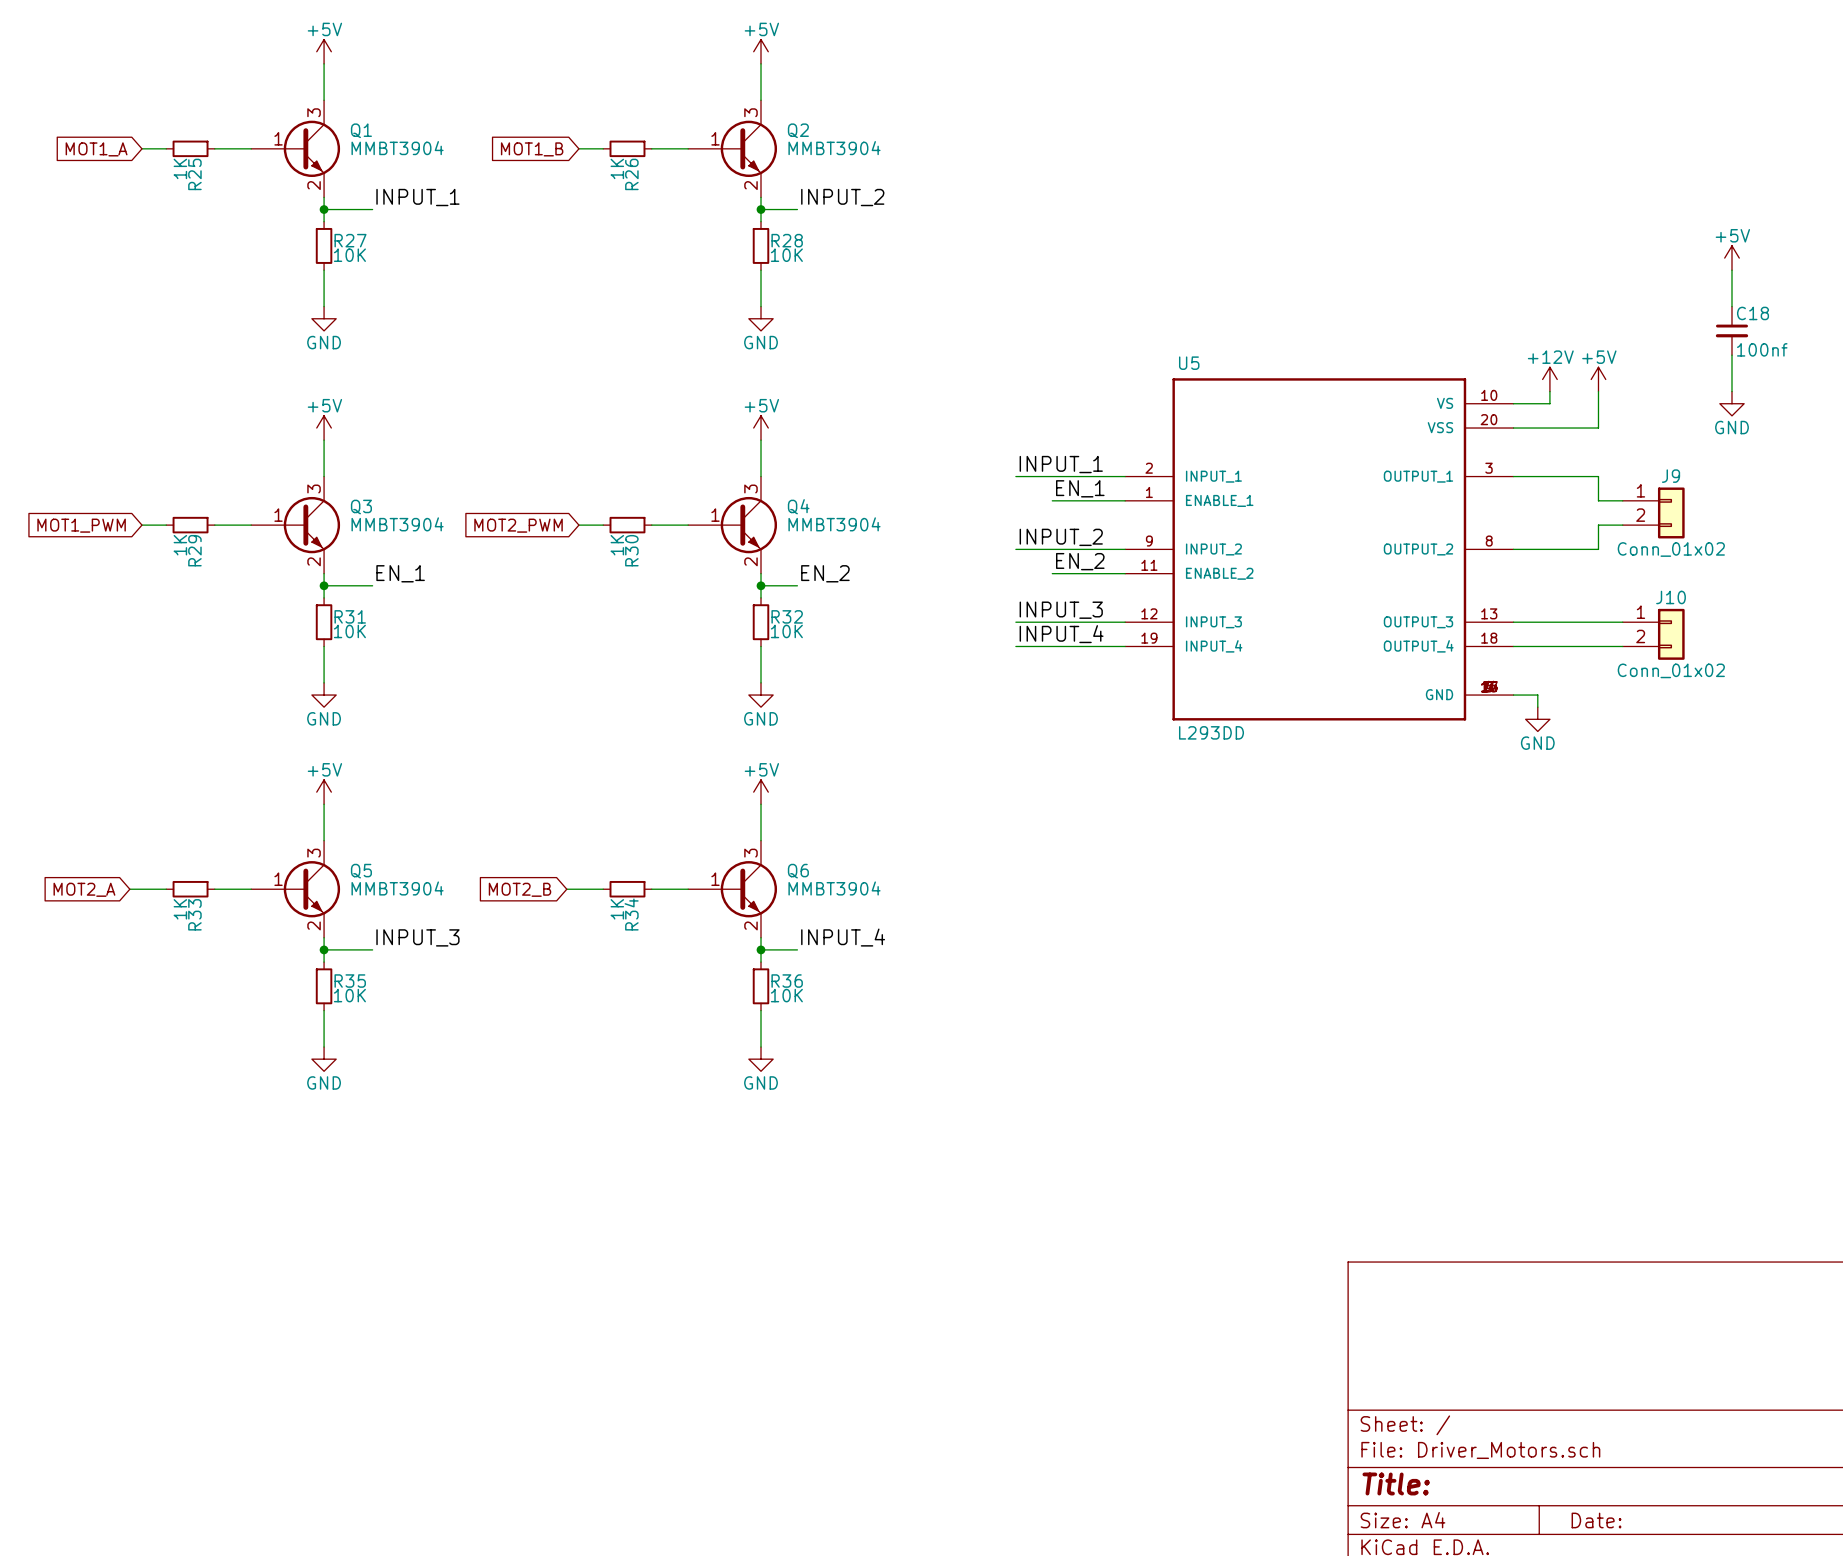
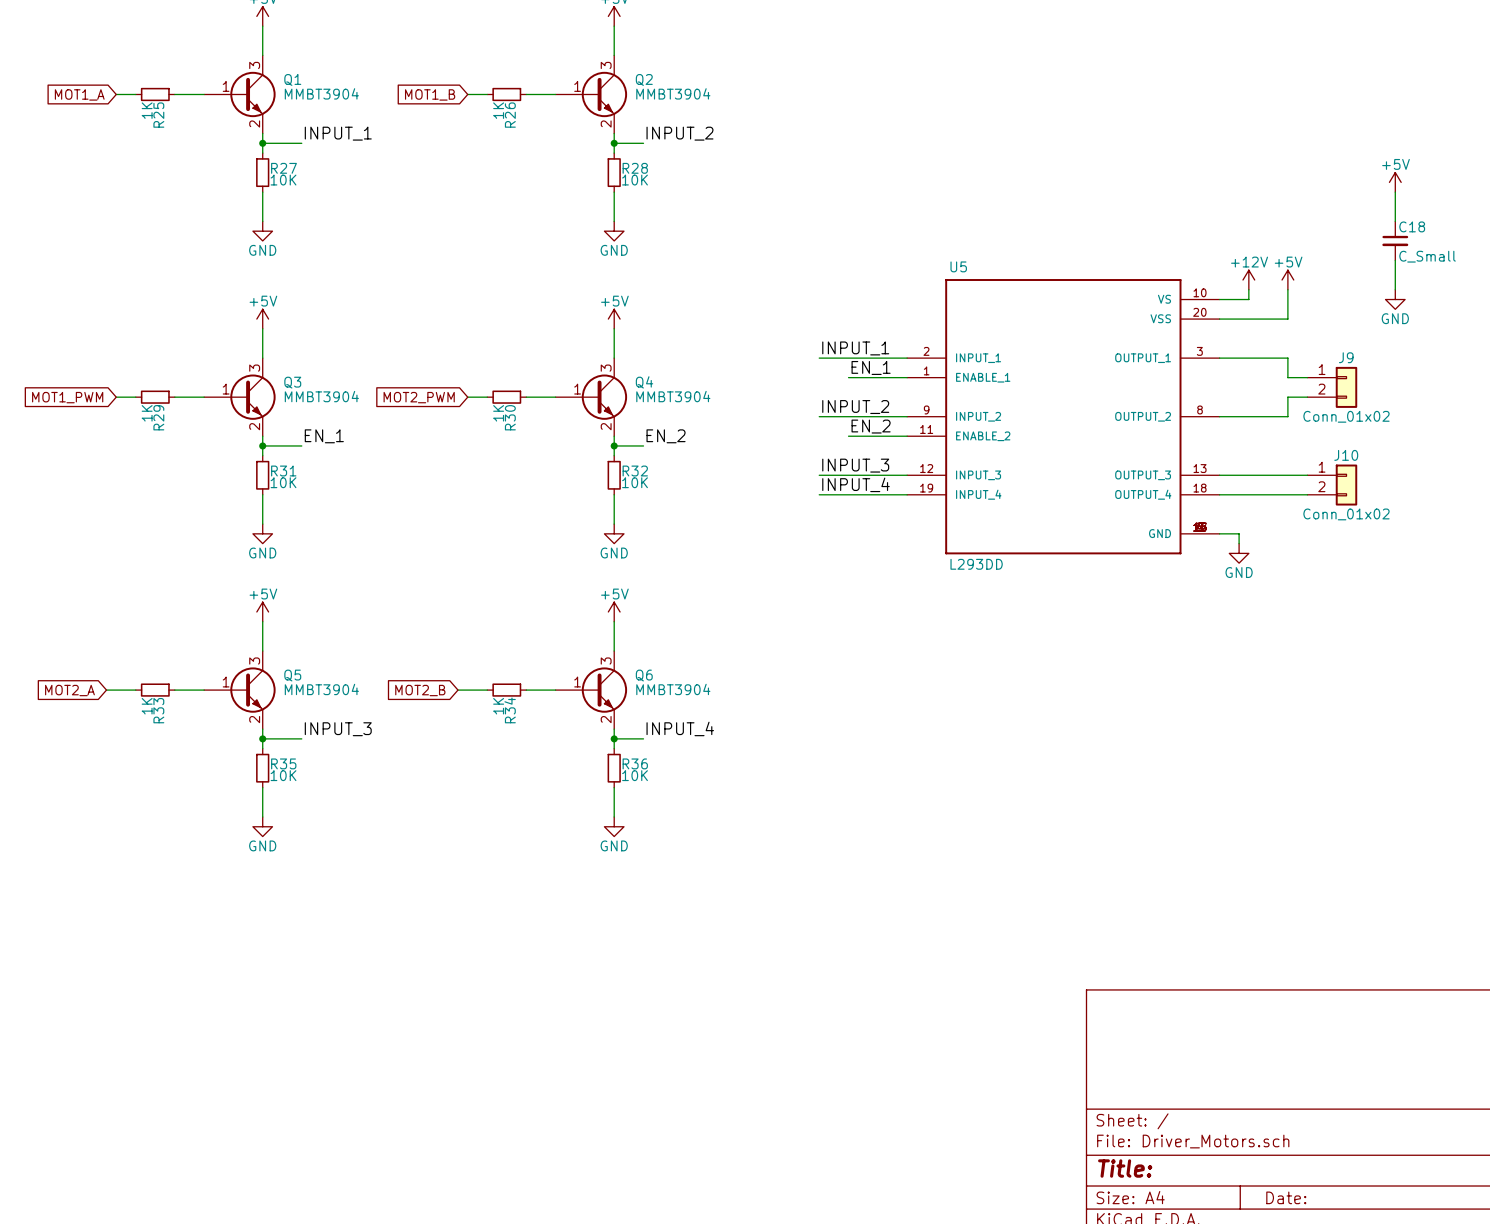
C18 value: 100nf (1762, 349) -> C_Small (1427, 256)

